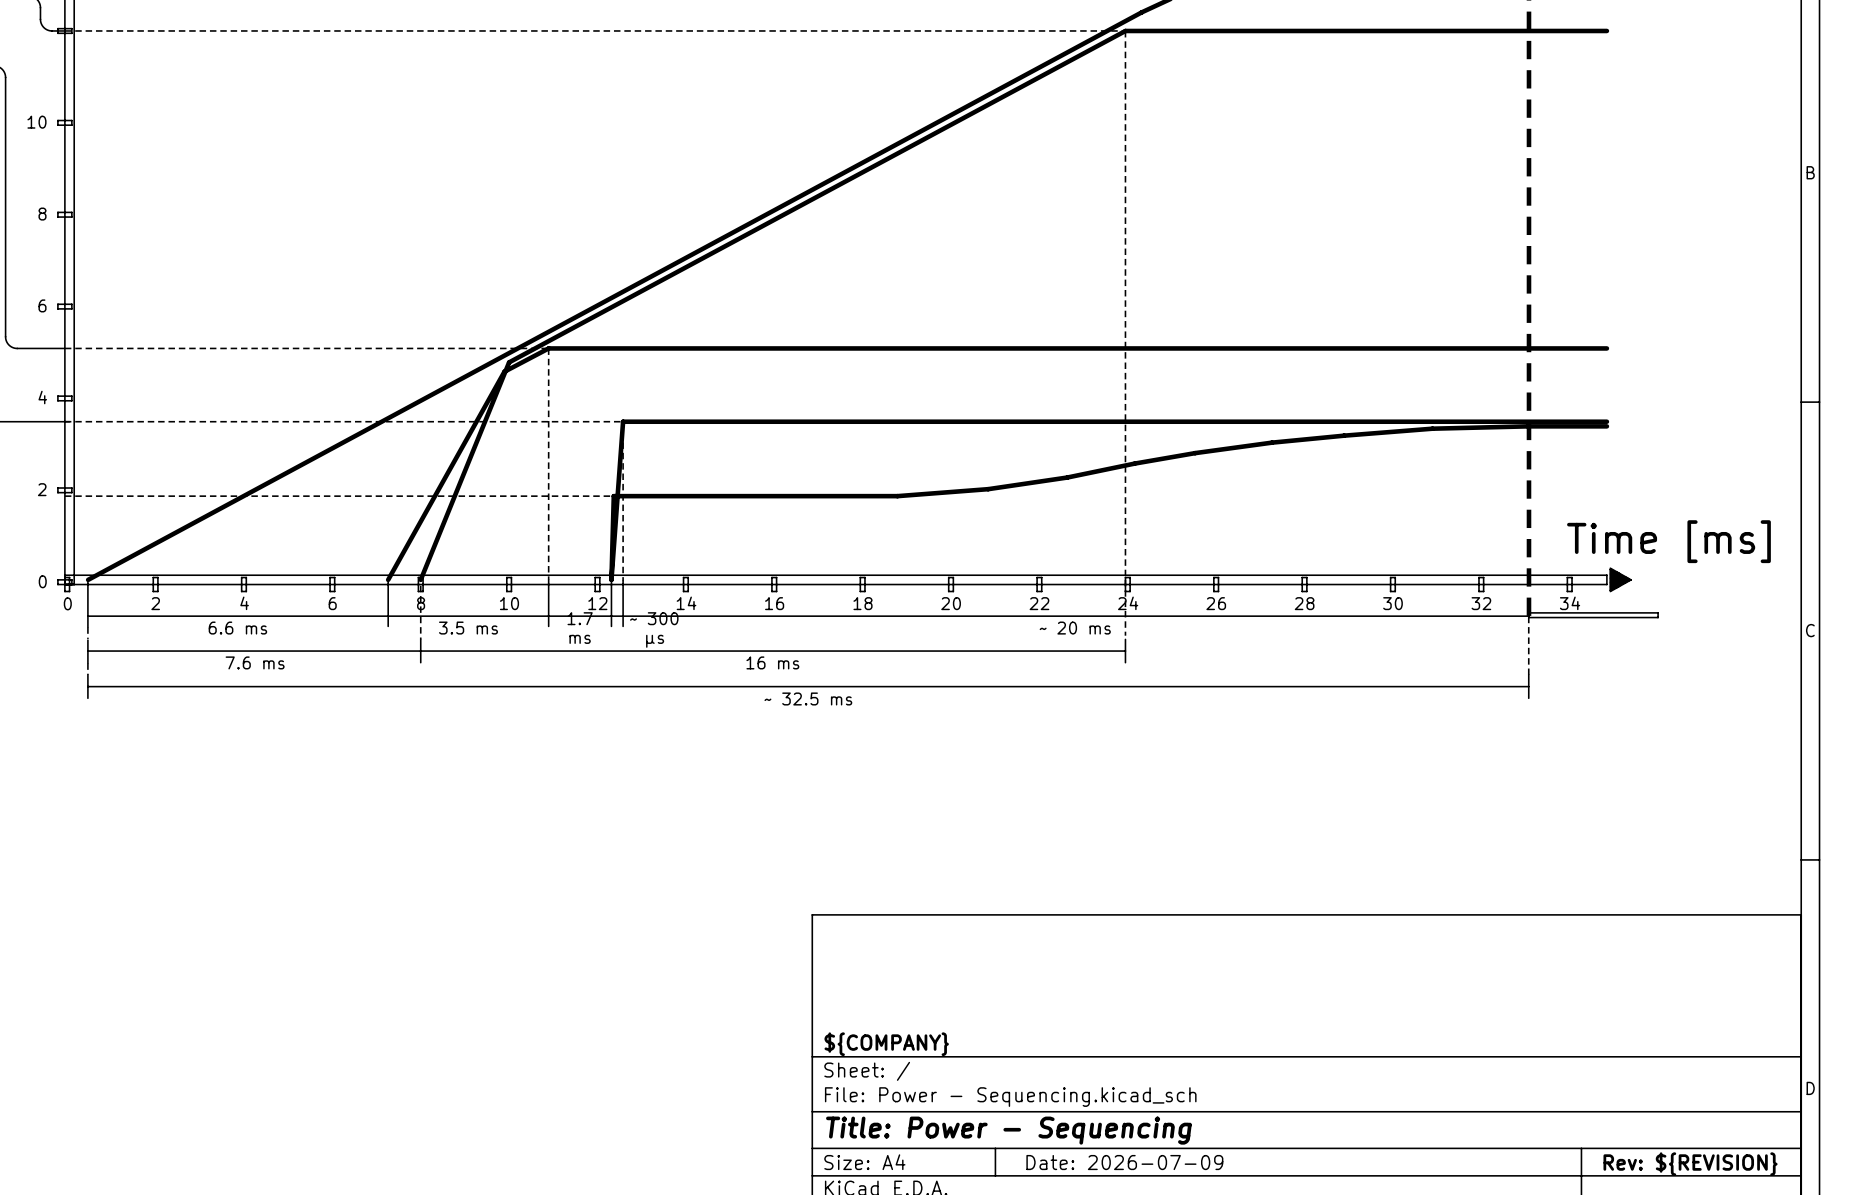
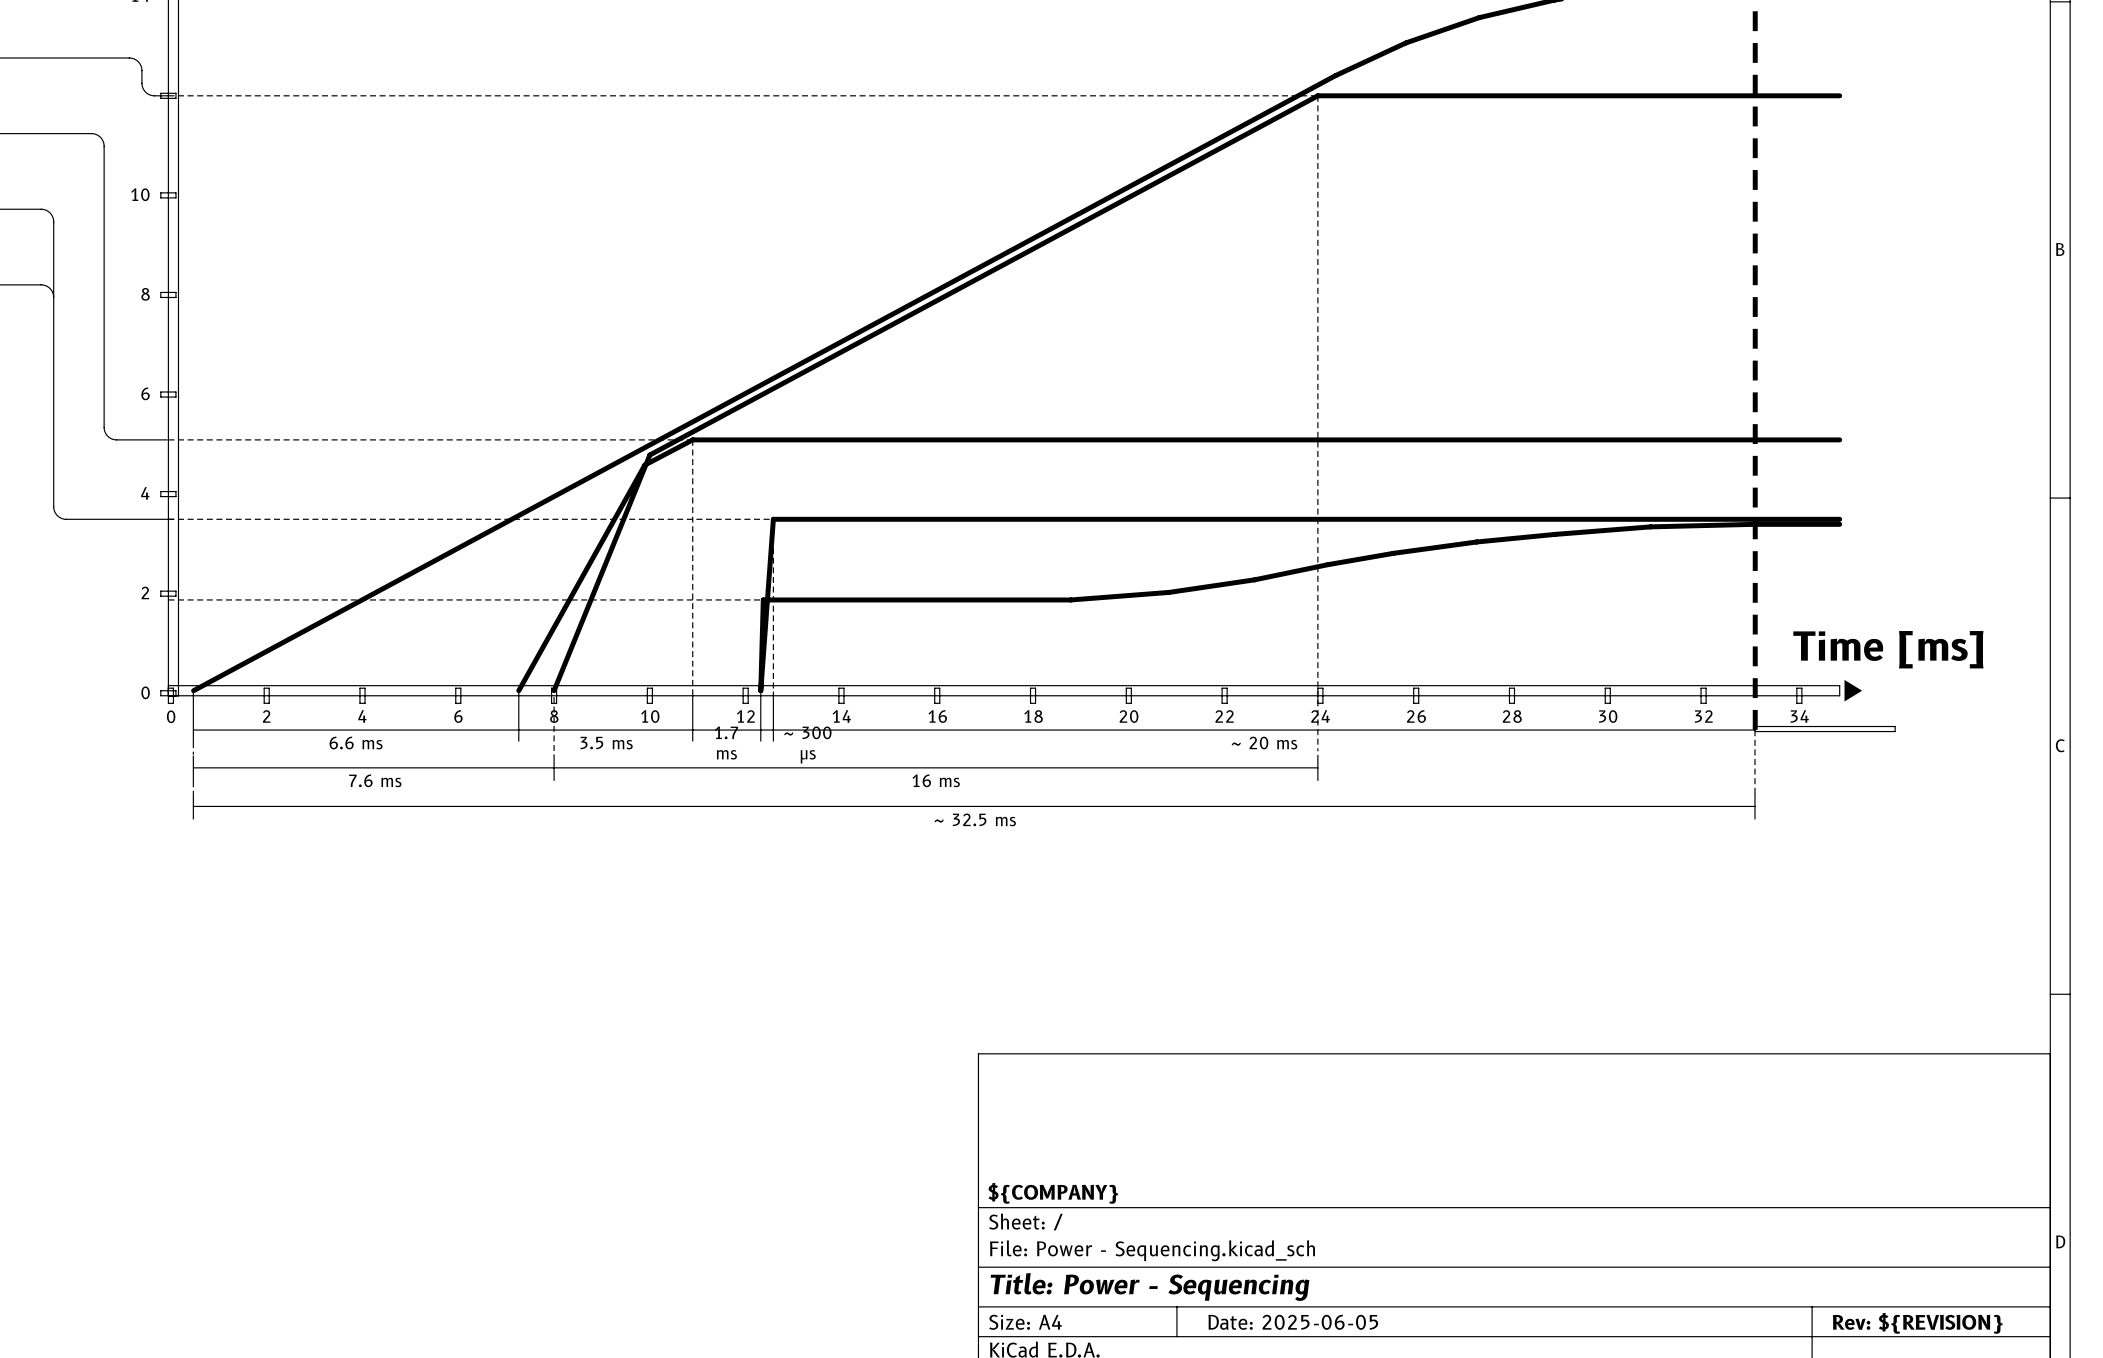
title block: Date: 2026-07-09 (1124, 1162) -> Date: 2025-06-05 (1293, 1322)

